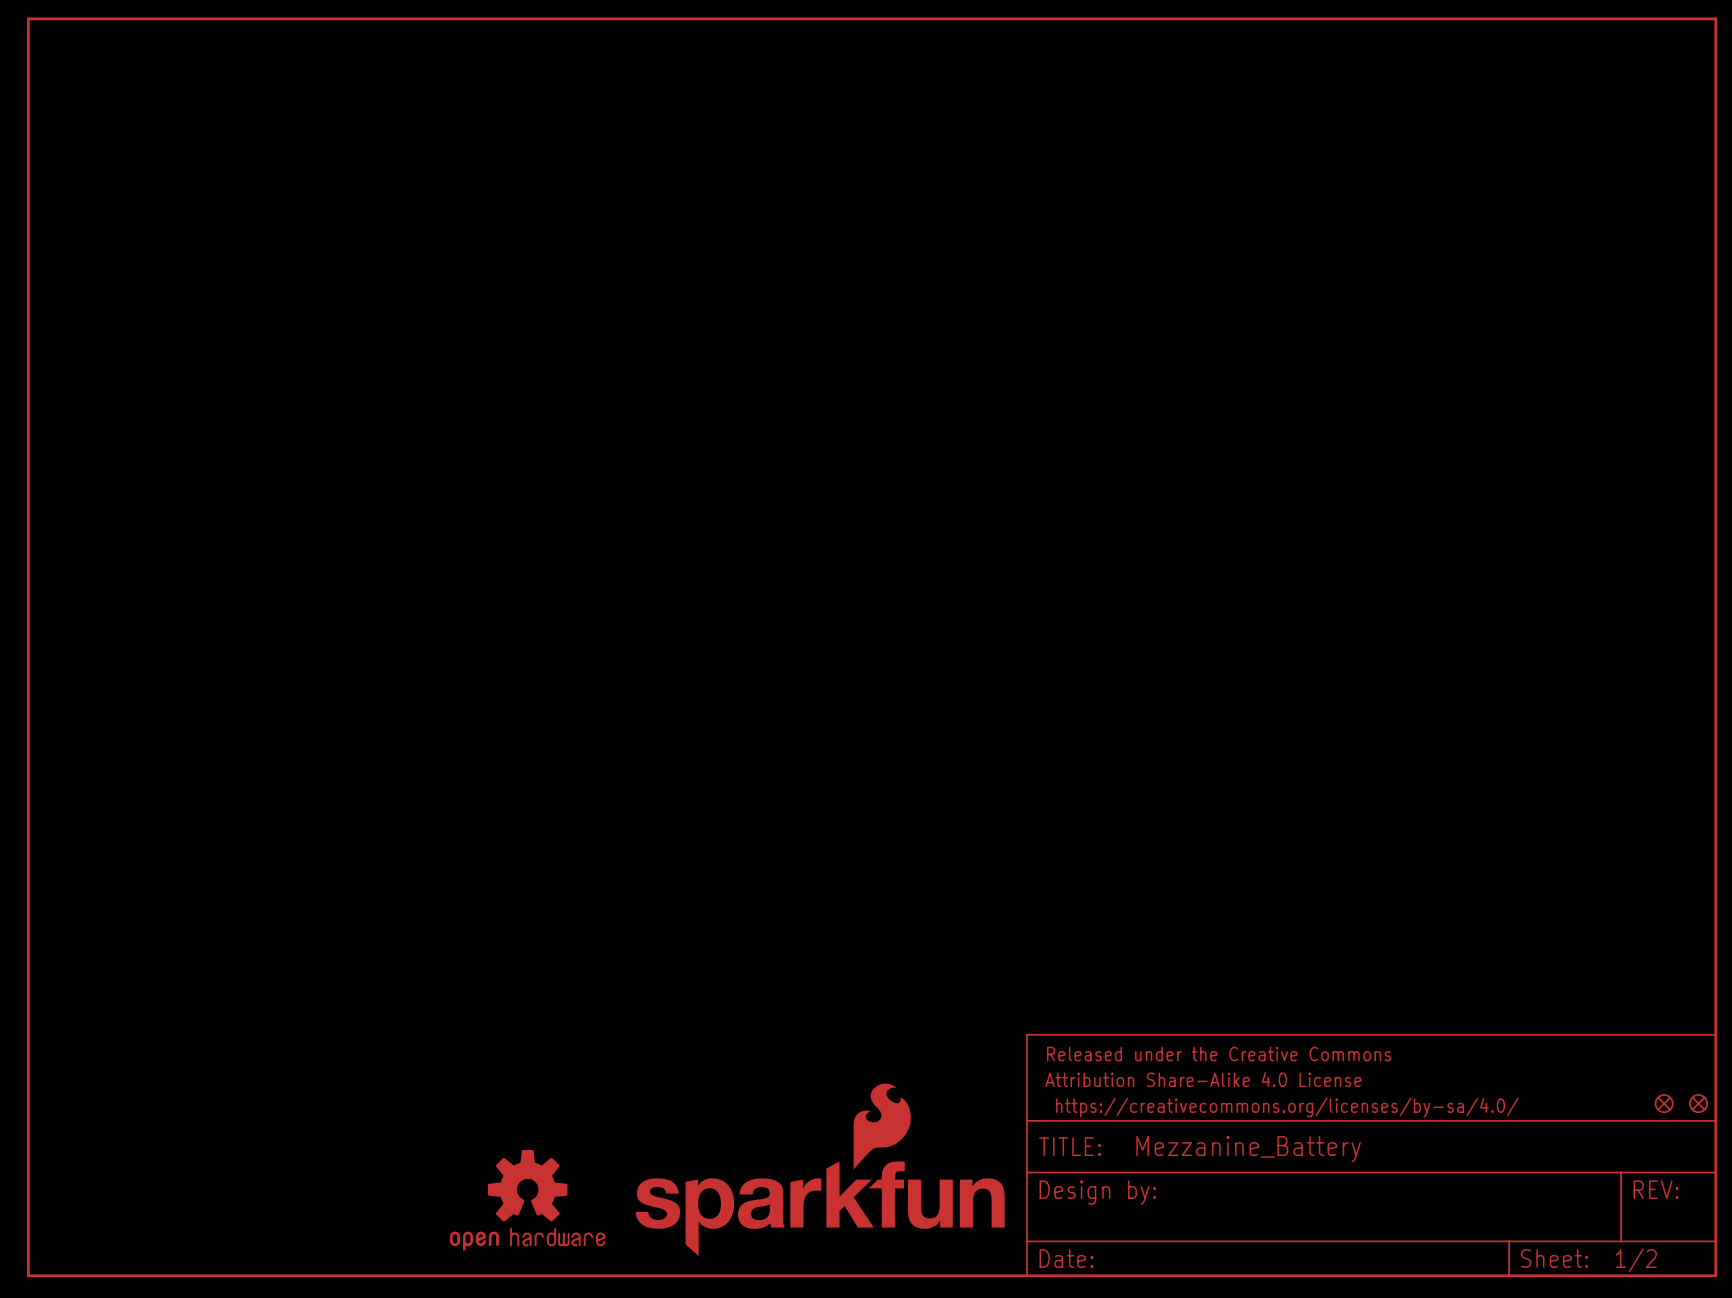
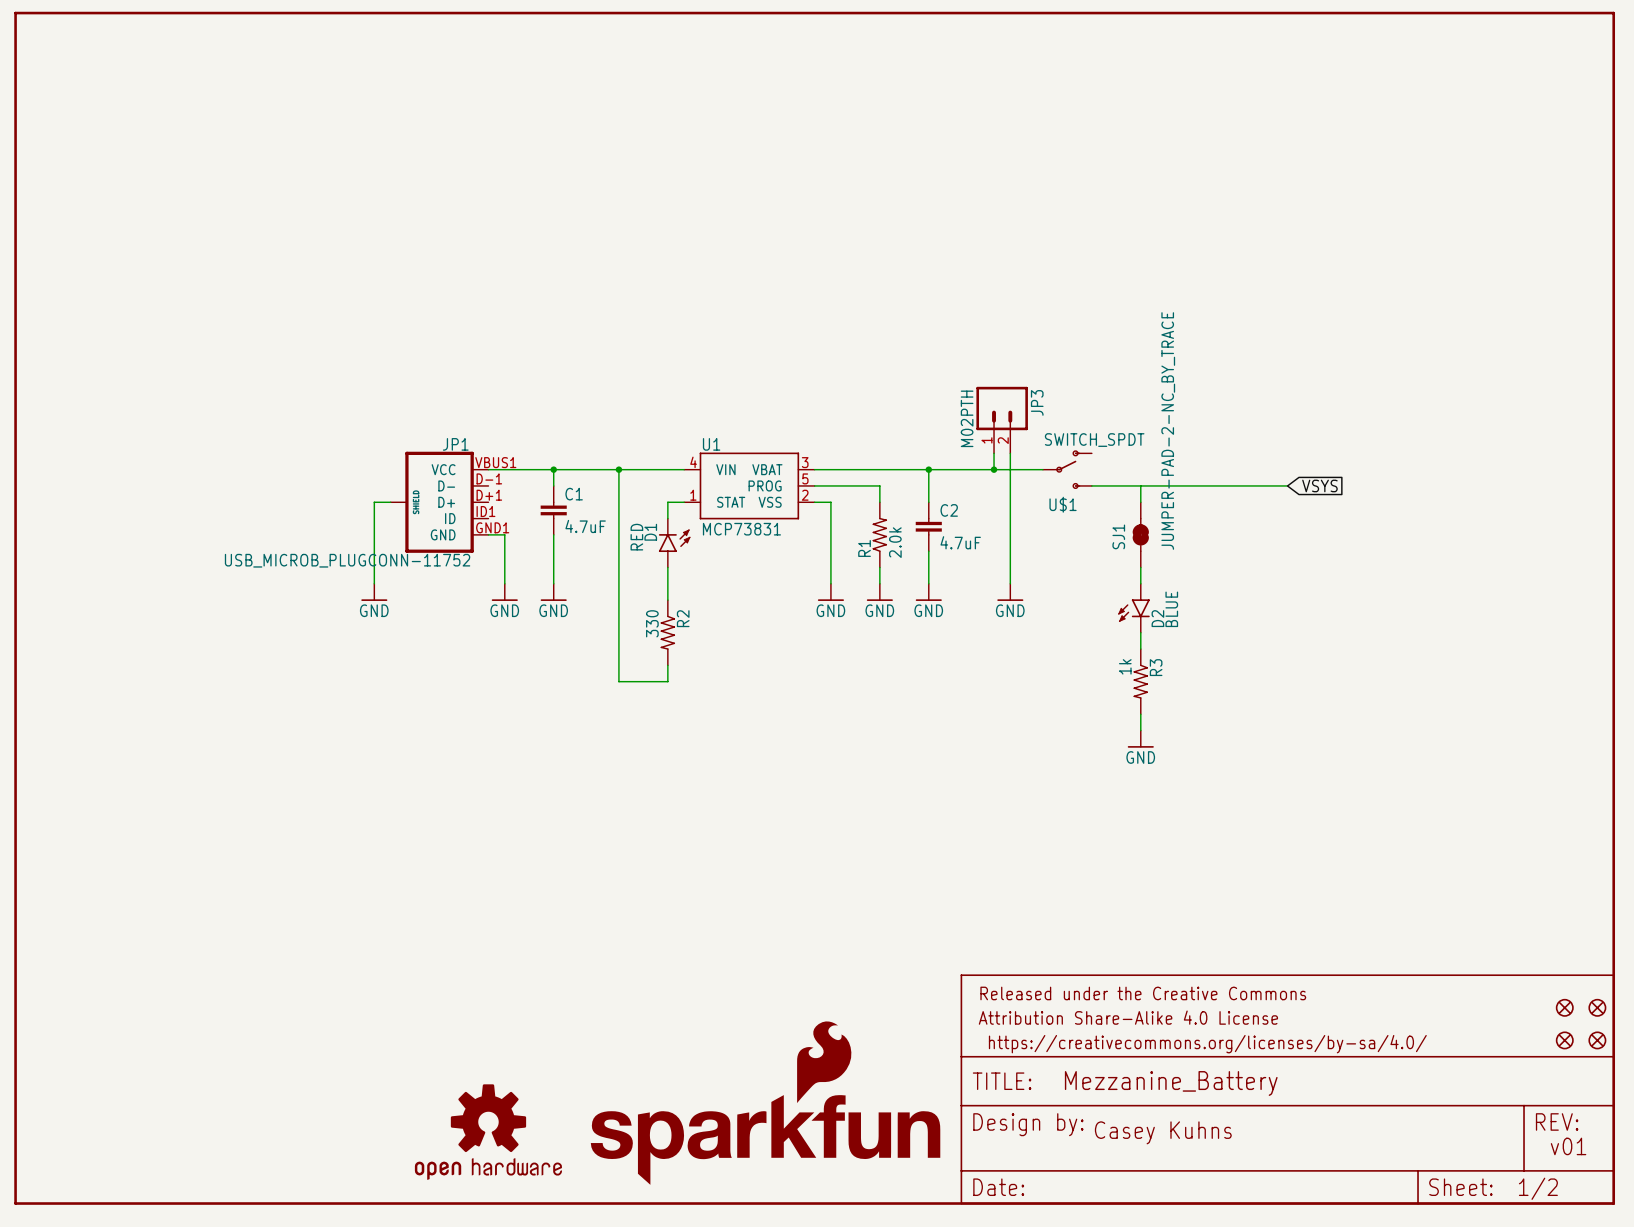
JP3: none -> M02PTH (1002, 420)
wire: none -> (994, 453) (994, 469)
wire: none -> (1010, 453) (1010, 583)
wire: none -> (488, 469) (684, 469)
wire: none -> (553, 469) (553, 485)
junction: none -> (553, 469)
wire: none -> (618, 469) (618, 681) (667, 681) (667, 665)
junction: none -> (618, 469)
wire: none -> (814, 469) (1042, 469)
wire: none -> (928, 469) (928, 502)
junction: none -> (928, 469)
junction: none -> (994, 469)
U$1: none -> SWITCH_SPDT (1067, 469)
U1: none -> MCP73831 (749, 485)
wire: none -> (814, 485) (879, 485) (879, 502)
wire: none -> (1091, 485) (1287, 485)
wire: none -> (1140, 485) (1140, 502)
global label: none -> VSYS (1319, 485)
wire: none -> (390, 502) (374, 502) (374, 583)
JP1: none -> USB_MICROB_PLUGCONN-11752 (439, 502)
wire: none -> (684, 502) (667, 502) (667, 518)
wire: none -> (814, 502) (830, 502) (830, 583)
C1: none -> 4.7uF (553, 510)
C2: none -> 4.7uF (928, 526)
wire: none -> (488, 534) (504, 534) (504, 583)
wire: none -> (553, 534) (553, 583)
R1: none -> 2.0k (879, 534)
SJ1: none -> JUMPER-PAD-2-NC_BY_TRACE (1140, 534)
D1: none -> RED (674, 543)
wire: none -> (928, 551) (928, 583)
wire: none -> (667, 567) (667, 600)
wire: none -> (879, 567) (879, 583)
wire: none -> (1140, 567) (1140, 583)
power symbol: none -> GND (374, 592)
power symbol: none -> GND (504, 592)
power symbol: none -> GND (553, 592)
power symbol: none -> GND (830, 592)
power symbol: none -> GND (879, 592)
power symbol: none -> GND (928, 592)
power symbol: none -> GND (1010, 592)
D2: none -> BLUE (1134, 608)
R2: none -> 330 (667, 632)
wire: none -> (1140, 632) (1140, 649)
R3: none -> 1k (1140, 681)
wire: none -> (1140, 714) (1140, 730)
power symbol: none -> GND (1140, 739)
part: none -> (1564, 1007)
part: none -> (1597, 1007)
text: none -> Casey Kuhns (1163, 1132)
text: none -> v01 (1568, 1146)

